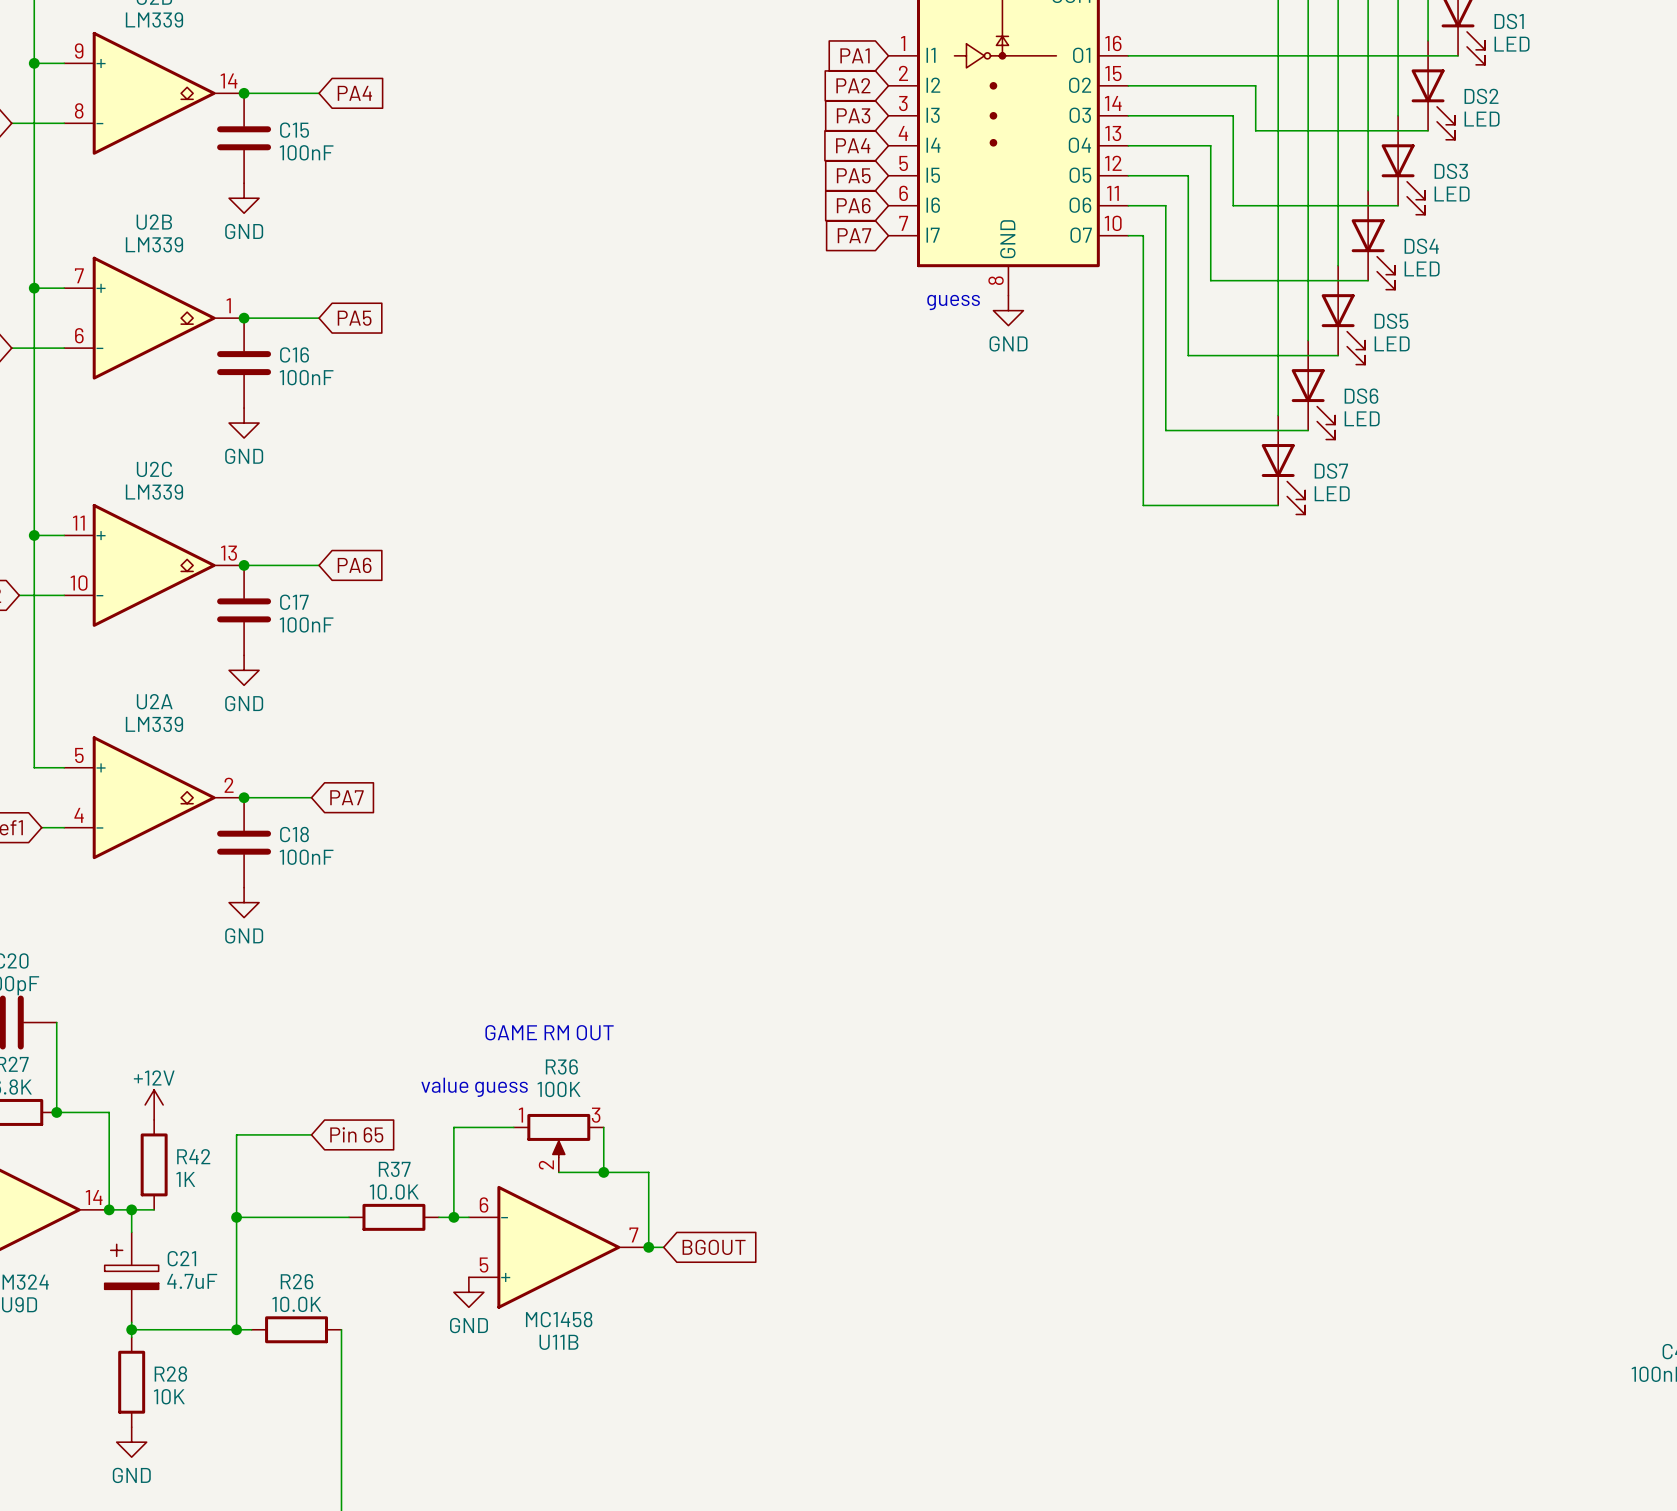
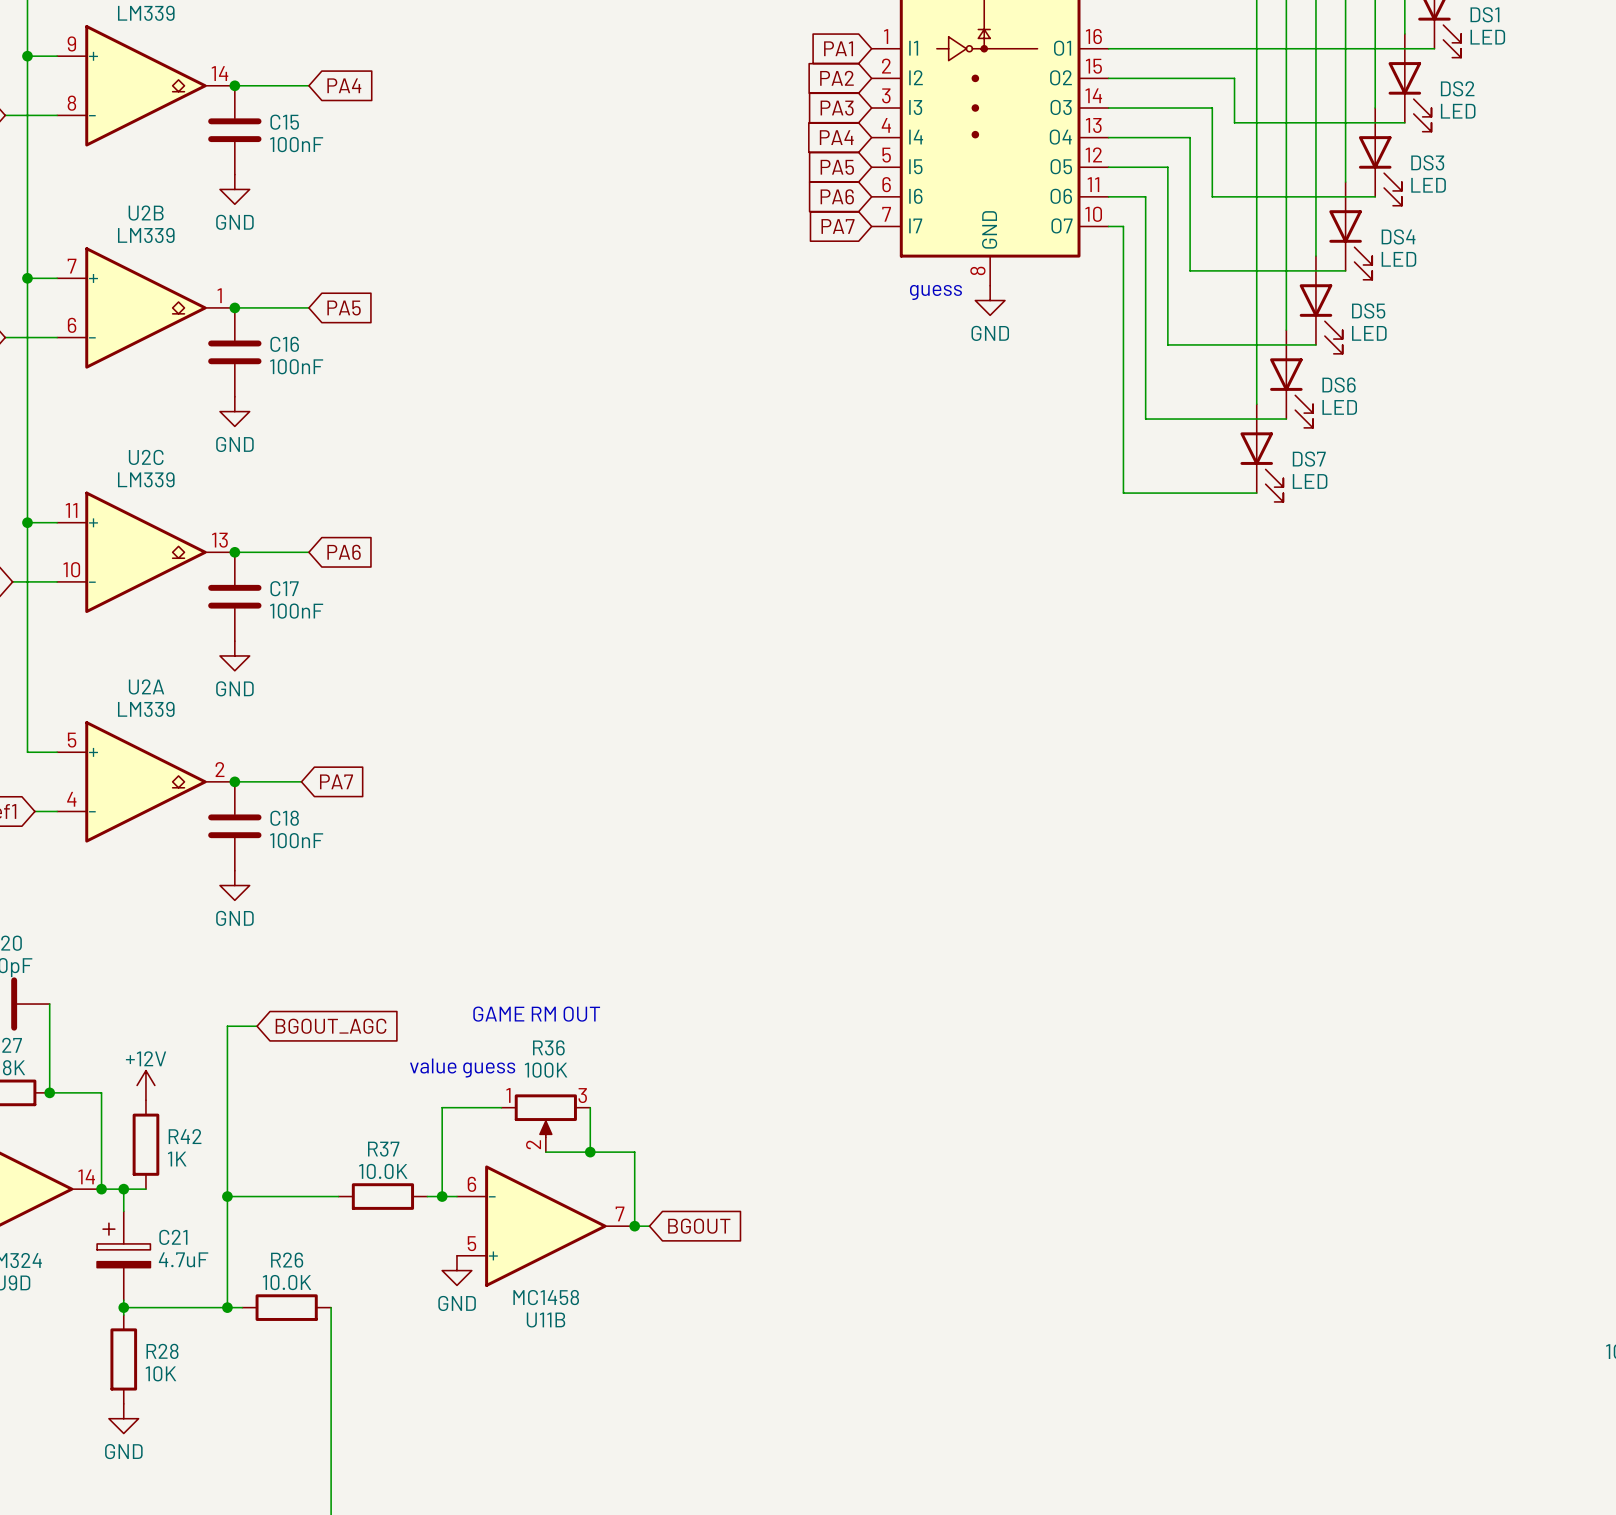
global label: none -> BGOUT_AGC (331, 1026)
wire: (236, 1134) (311, 1134) -> (227, 1115) (227, 1026) (257, 1026)
global label: Pin 65 (356, 1134) -> none

